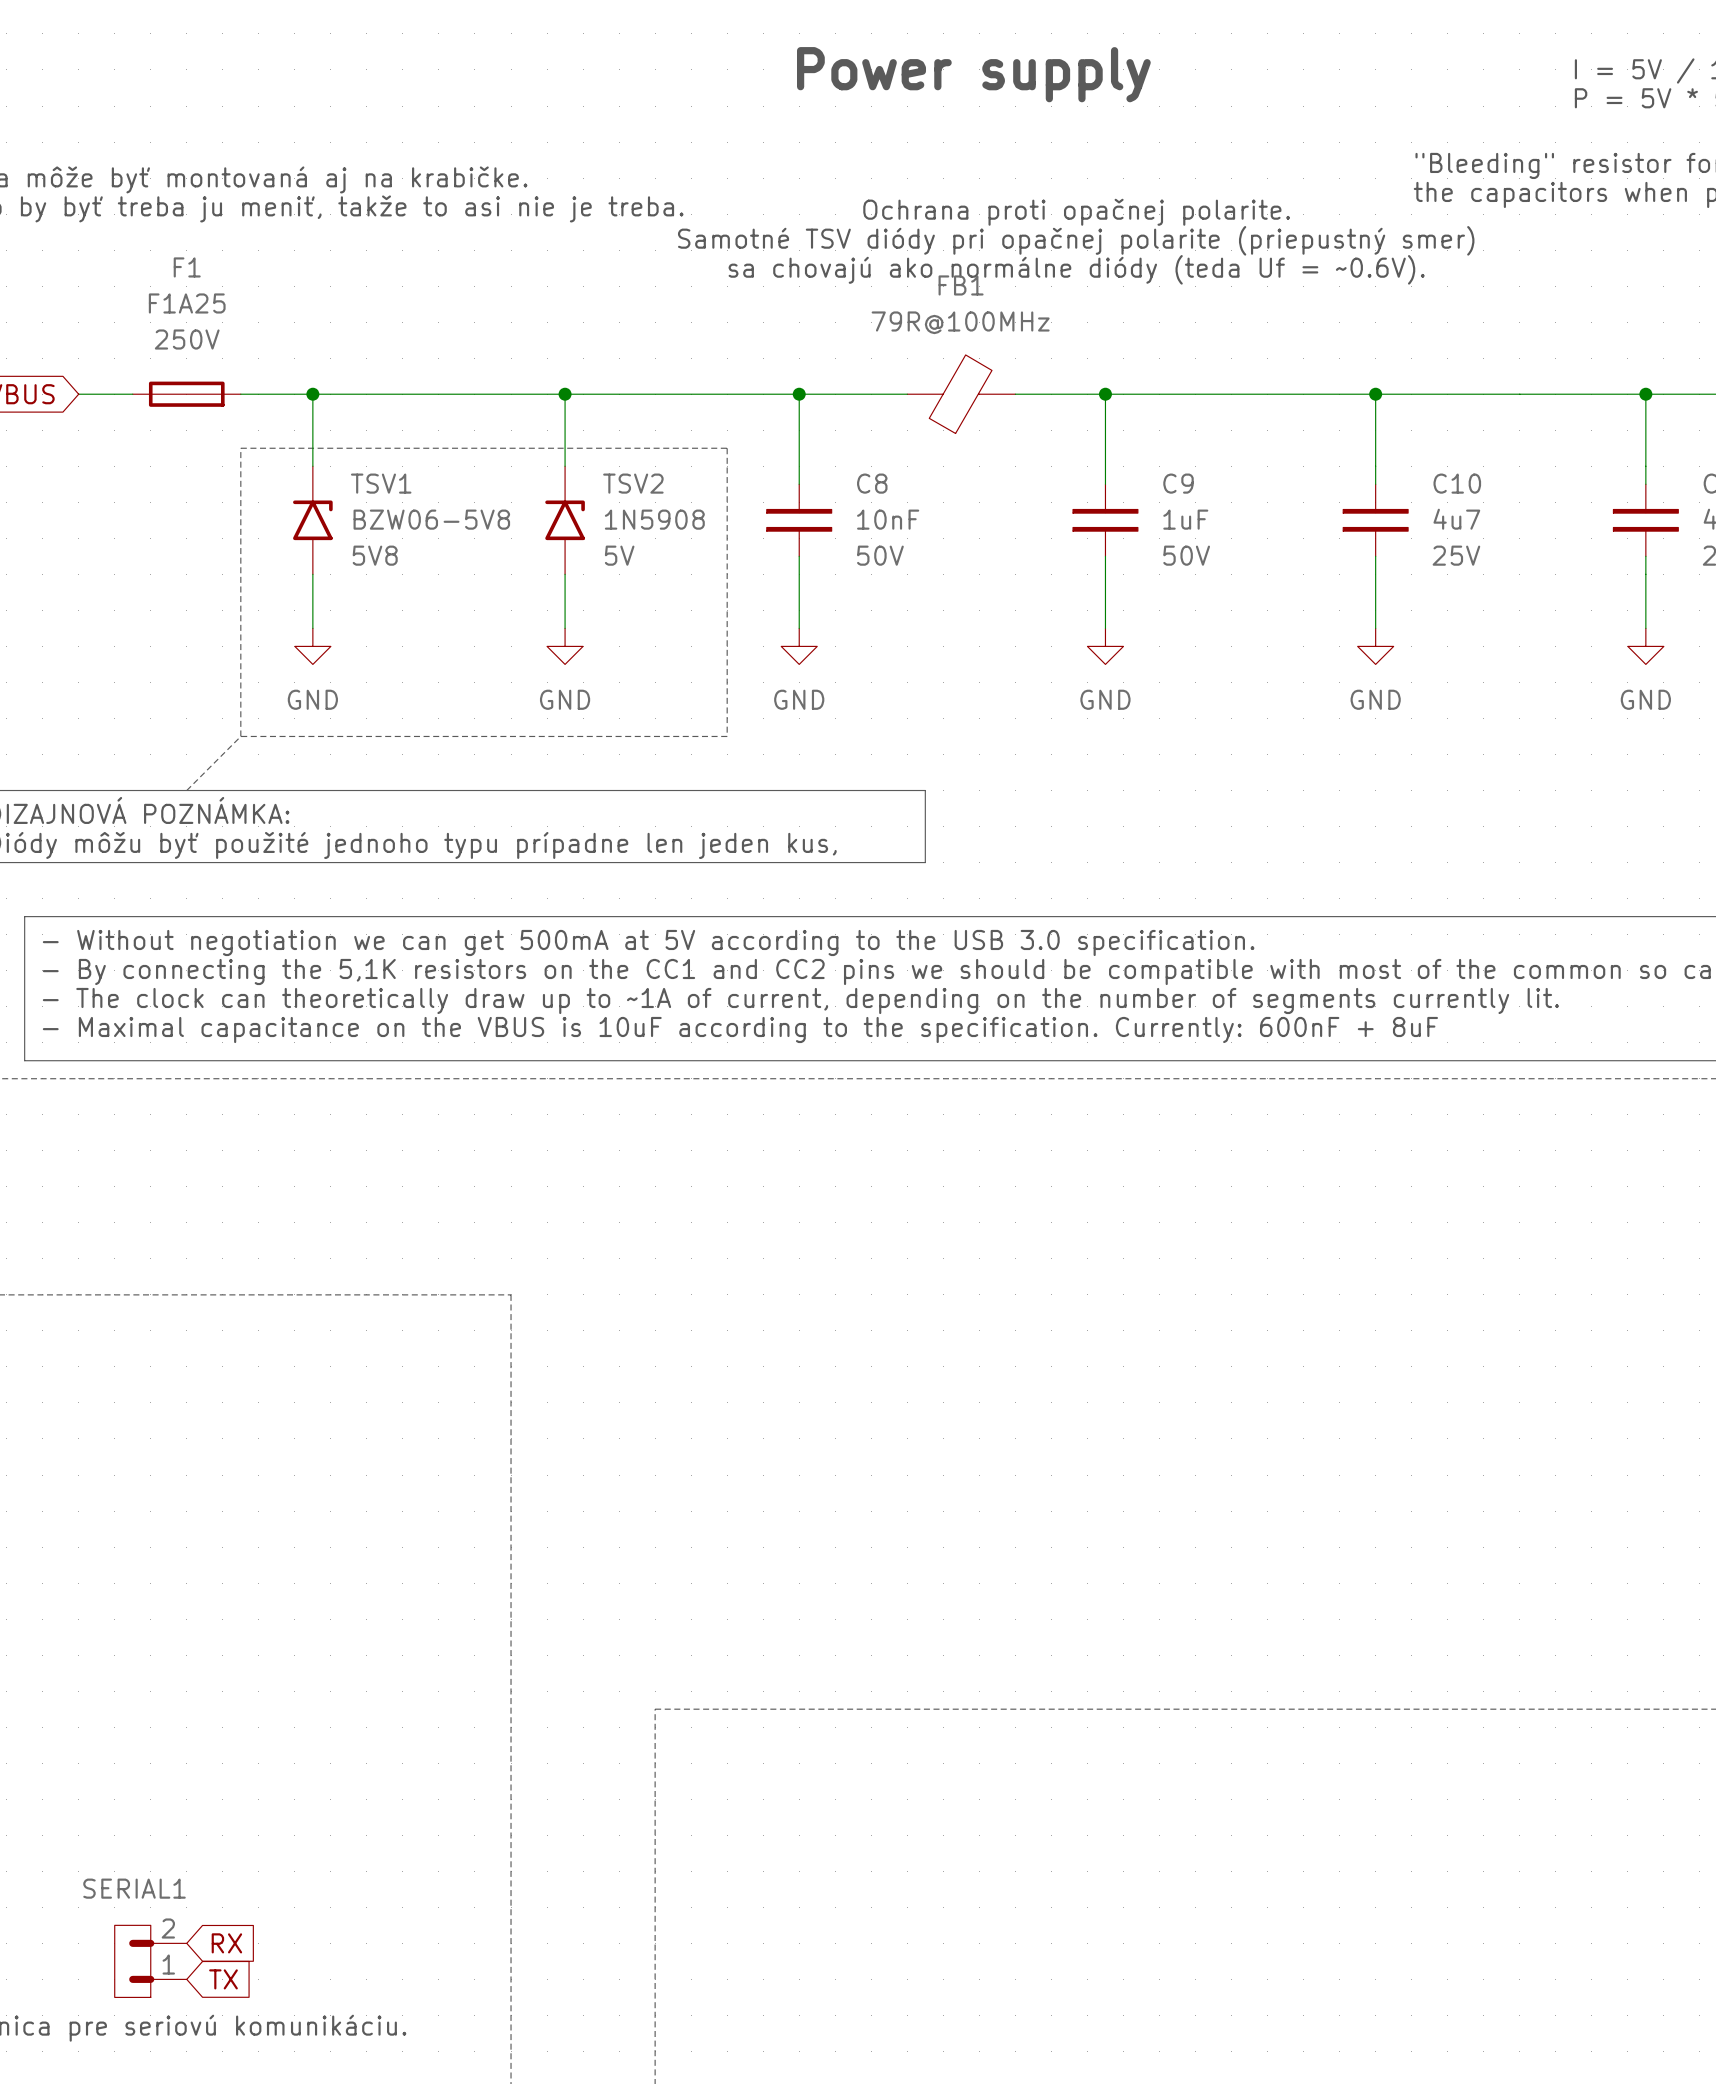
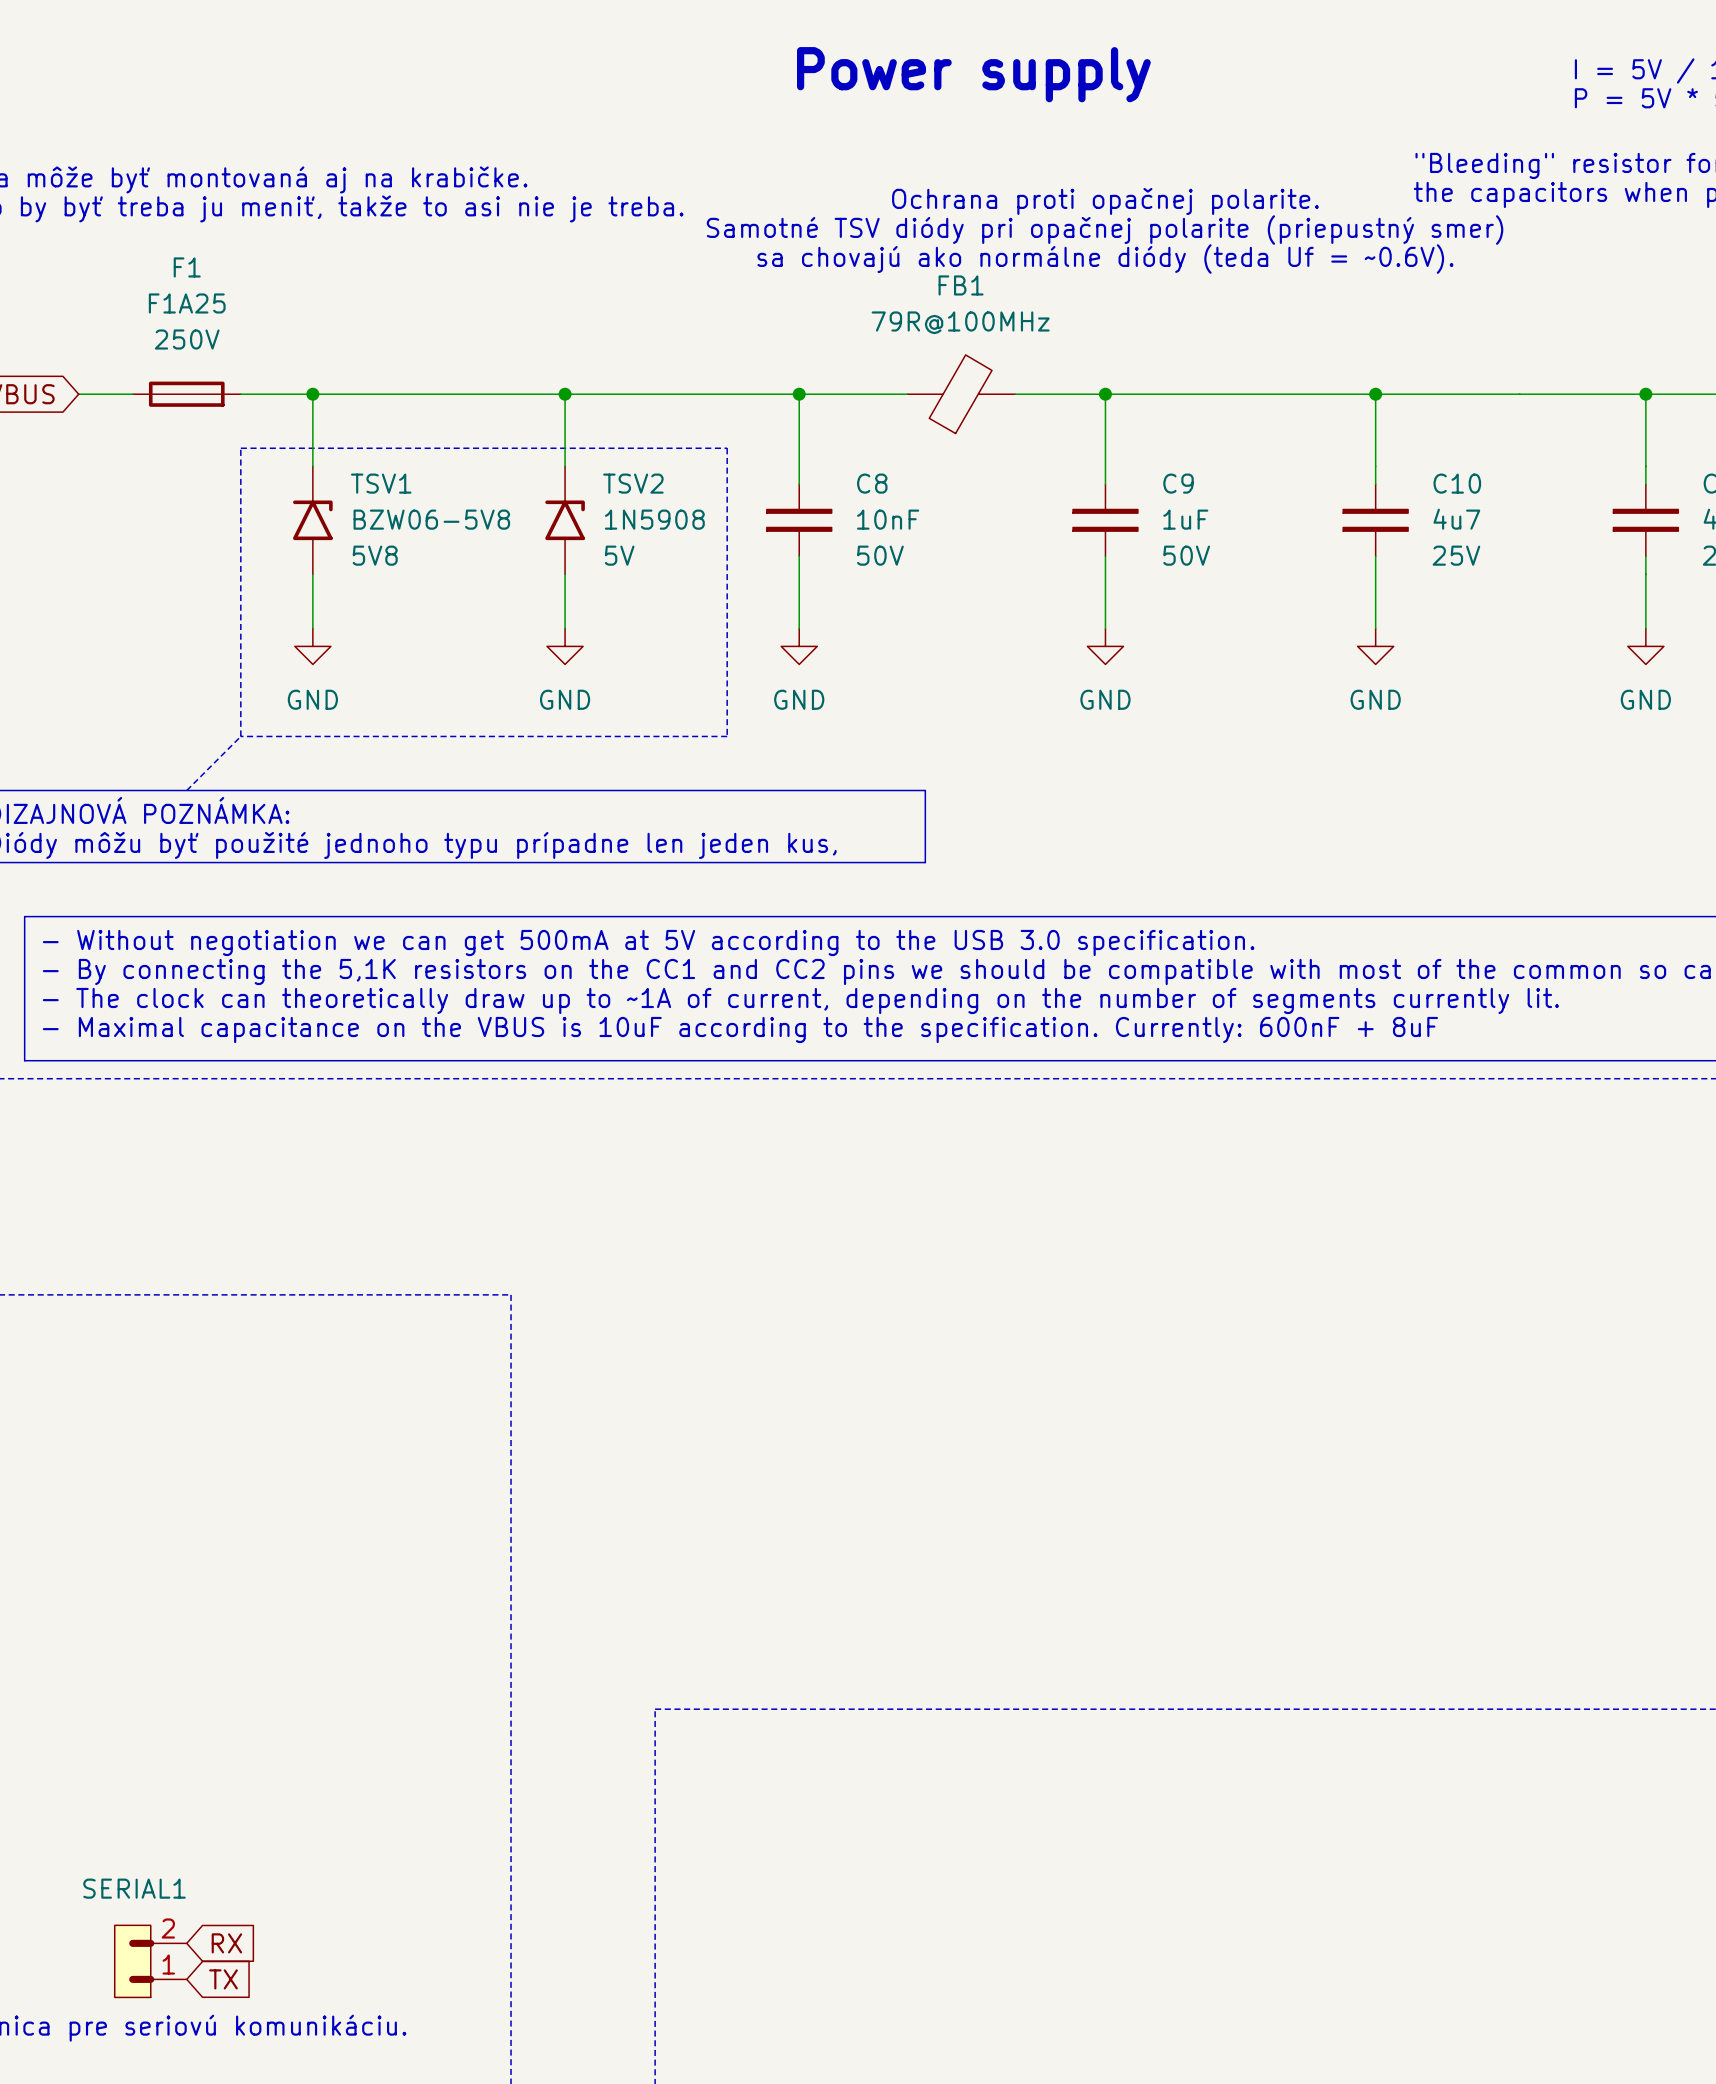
text position: Ochrana proti opačnej polarite. (1076, 212) -> Ochrana proti opačnej polarite. (1105, 201)
text position: Samotné TSV diódy pri opačnej polarite (priepustný smer) (1076, 240) -> Samotné TSV diódy pri opačnej polarite (priepustný smer) (1105, 230)
text position: sa chovajú ako normálne diódy (teda Uf = ~0.6V). (1076, 269) -> sa chovajú ako normálne diódy (teda Uf = ~0.6V). (1105, 259)

